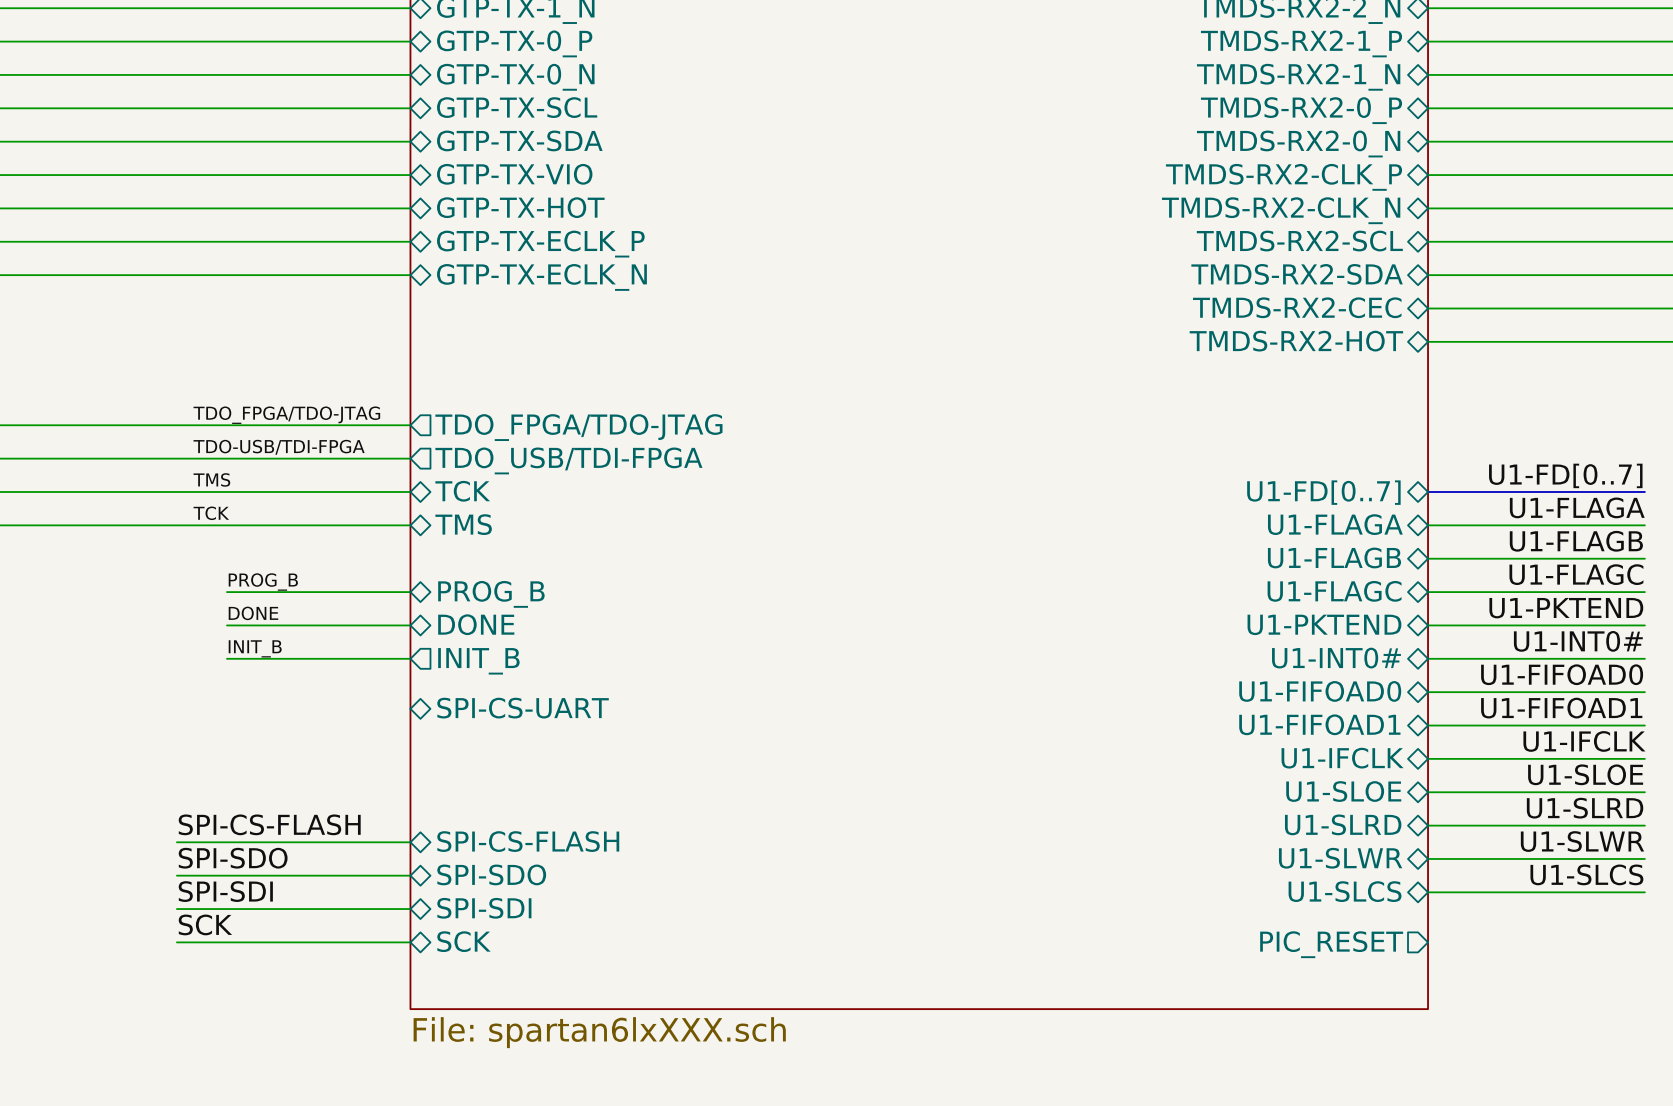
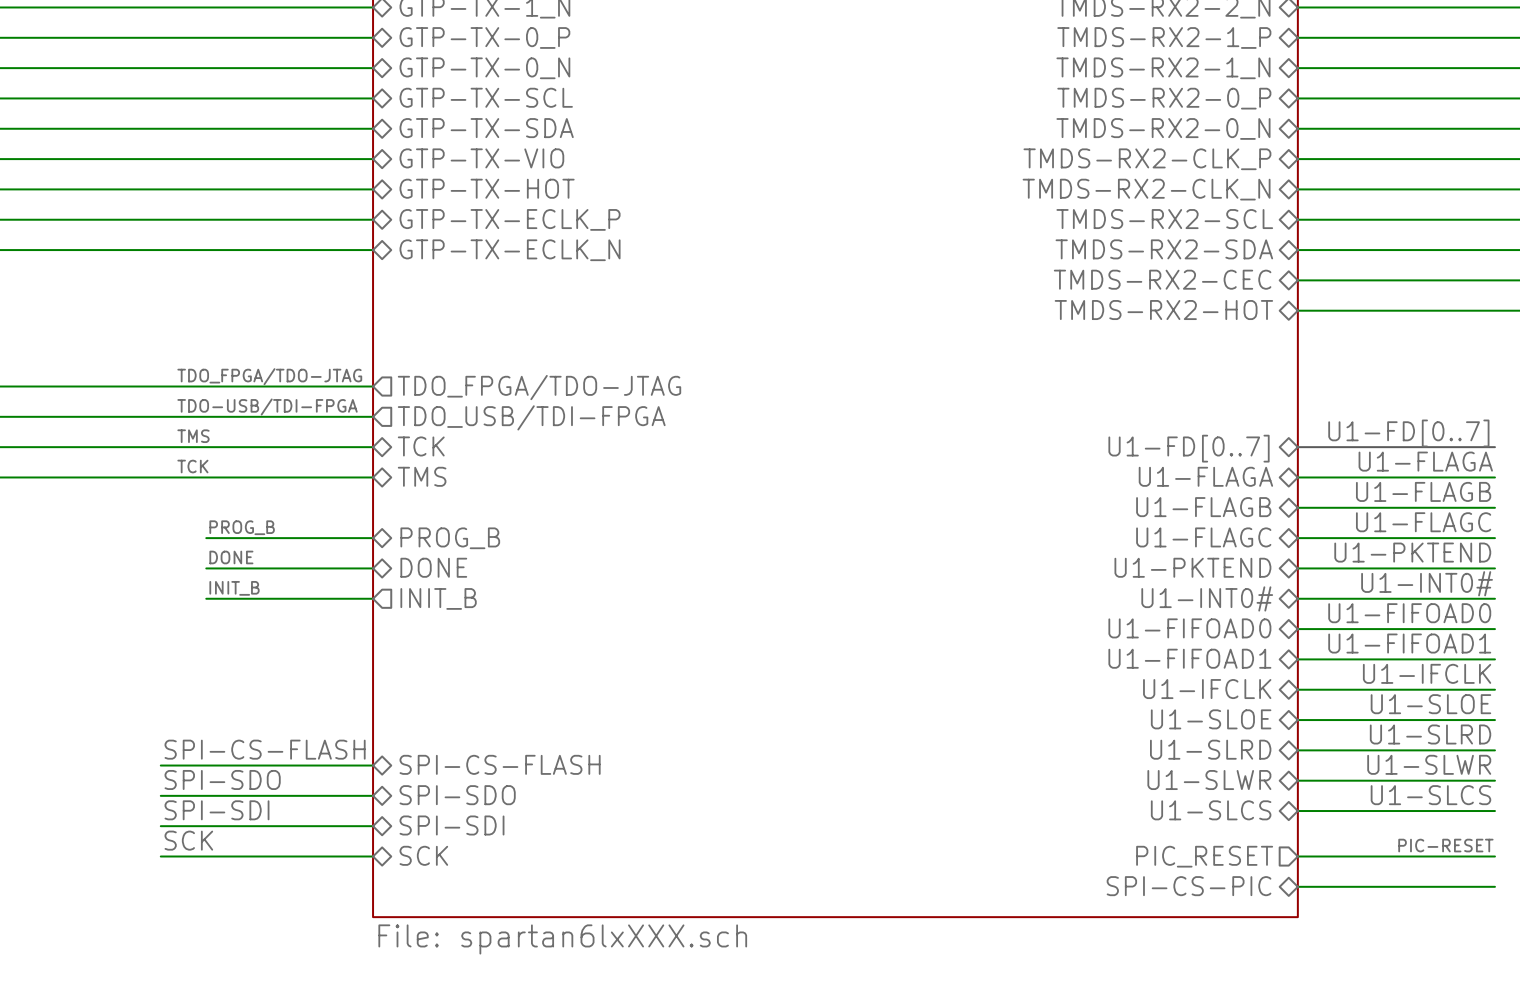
sheet pin: SPI-CS-UART (523, 708) -> none
label: none -> PIC-RESET (1445, 845)
wire: none -> (1297, 856) (1494, 856)
sheet pin: none -> SPI-CS-PIC (1189, 886)
wire: none -> (1297, 886) (1494, 886)

